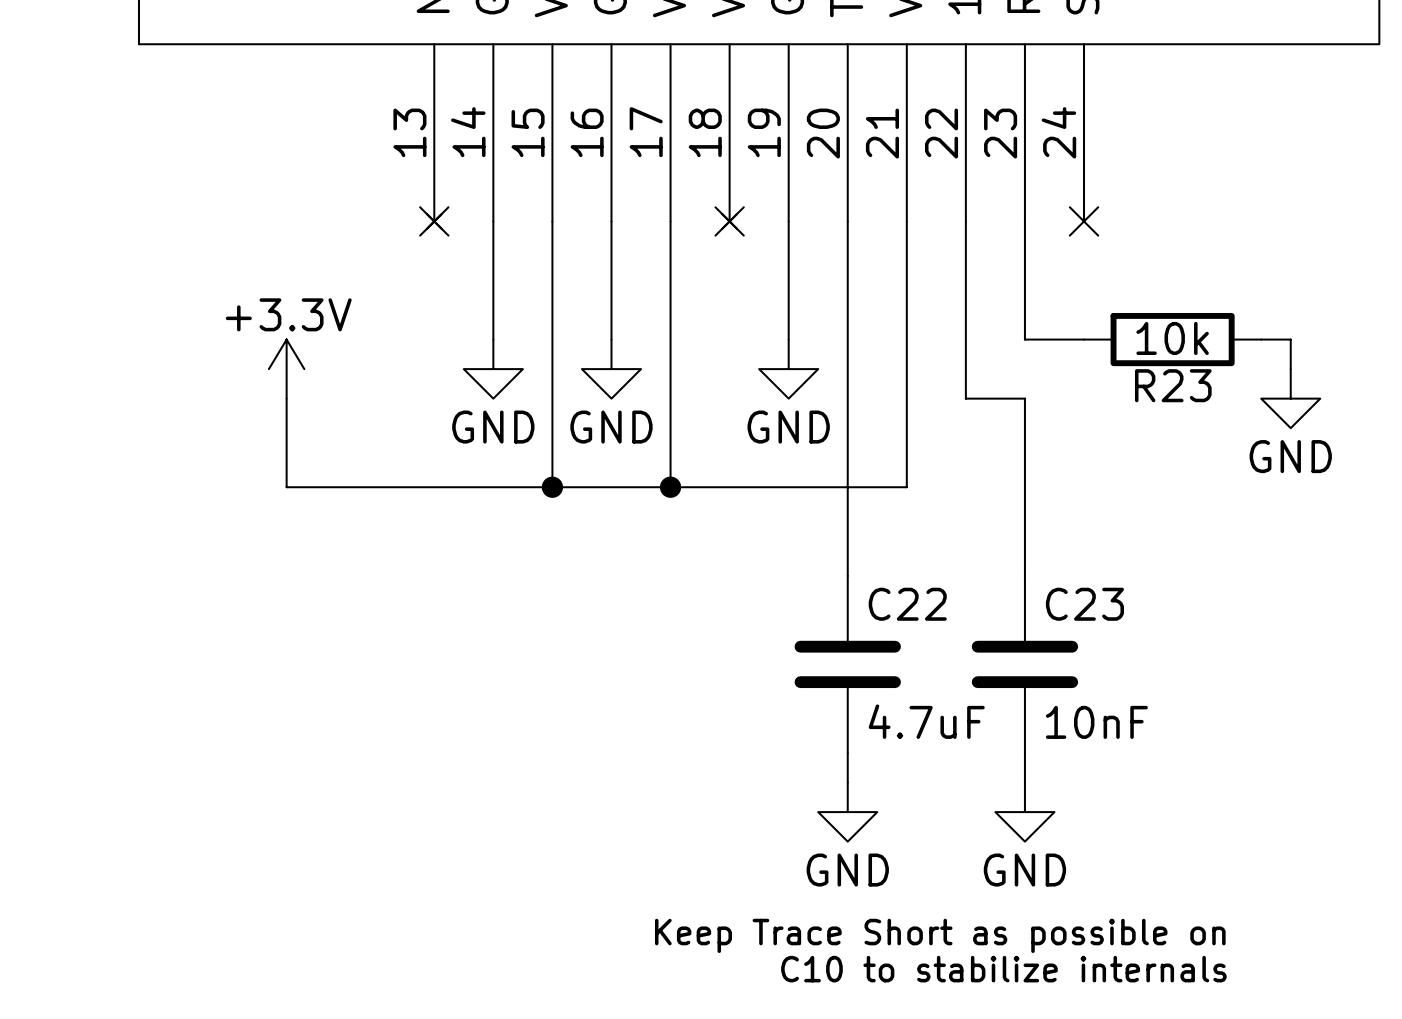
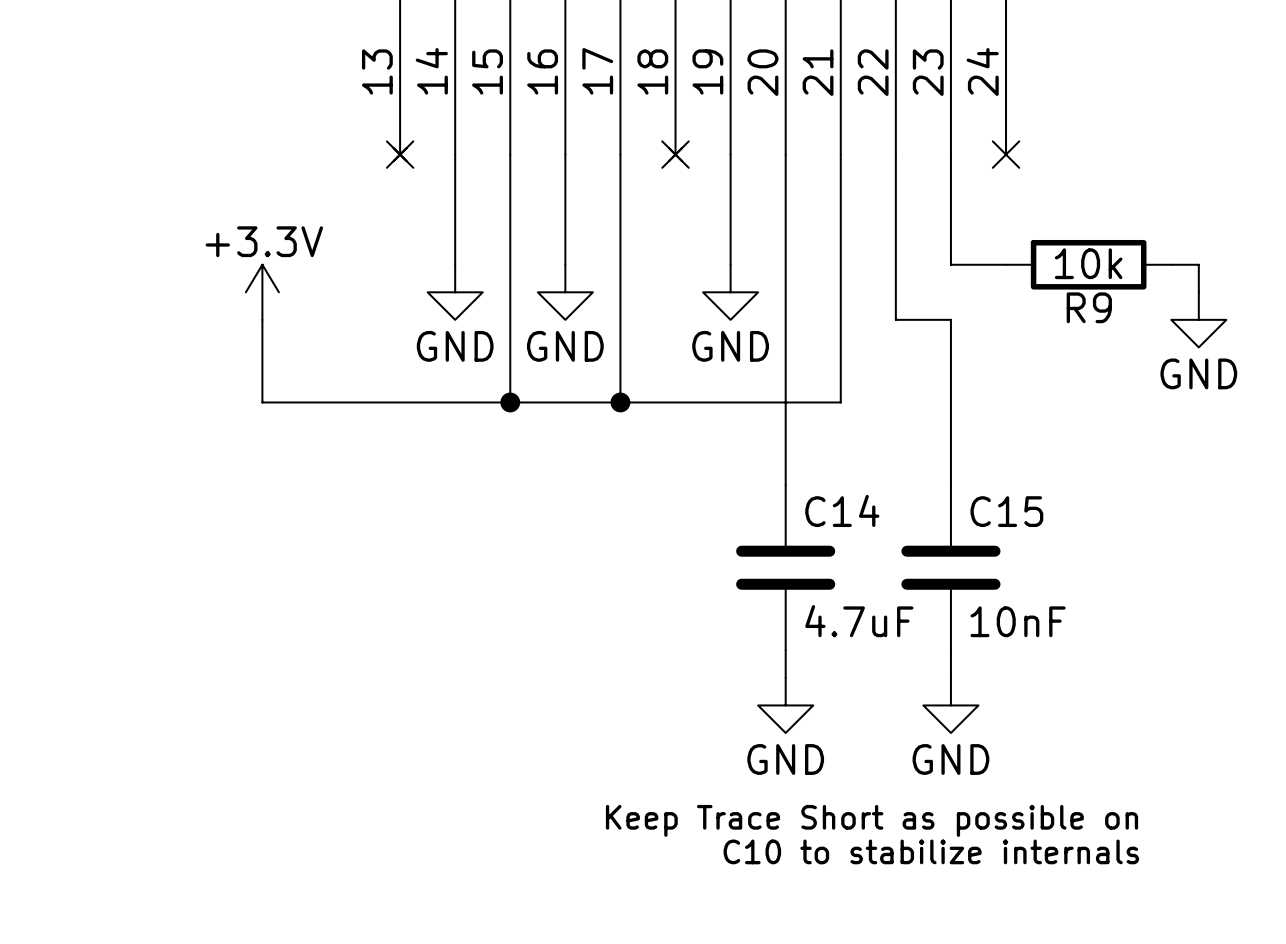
R23 name: R23 (1173, 385) -> R9 (1089, 307)
C22 name: C22 (907, 604) -> C14 (842, 510)
C23 name: C23 (1084, 604) -> C15 (1006, 511)

